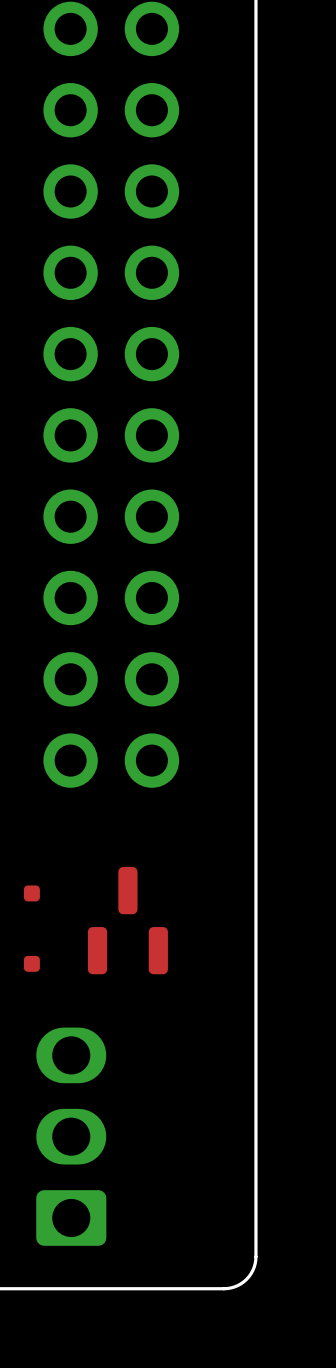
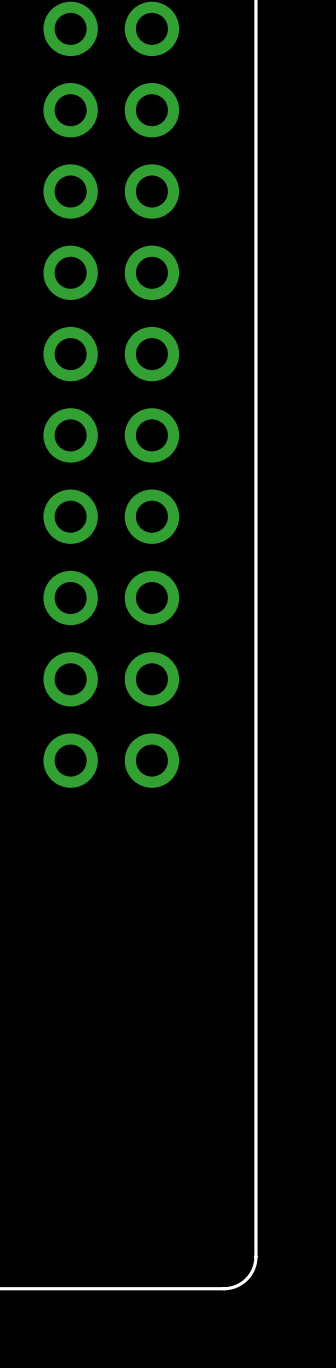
part: (127, 920) -> none
part: (31, 928) -> none
part: (71, 1136) -> none

